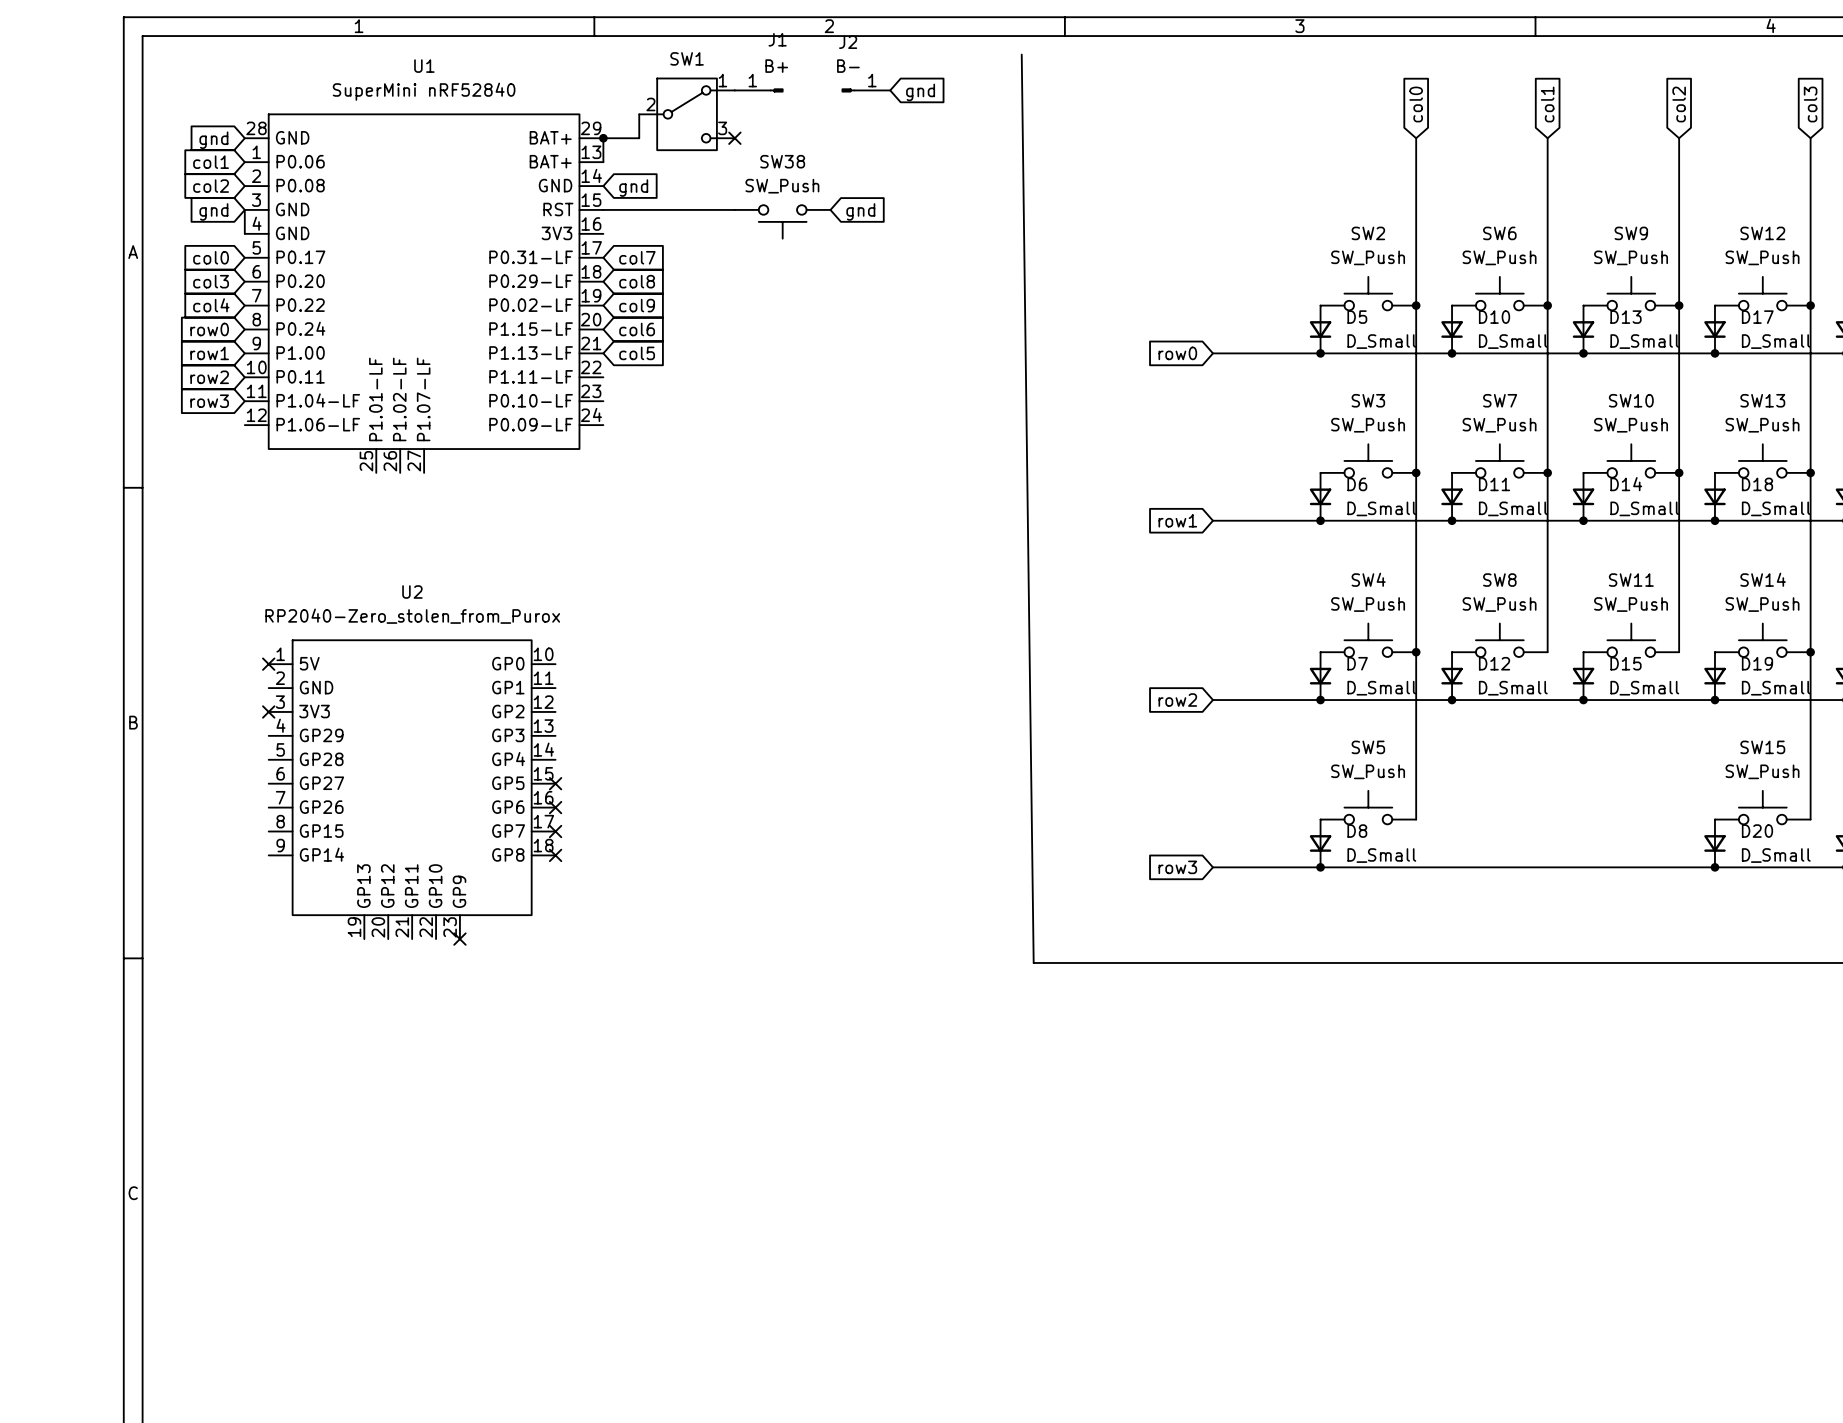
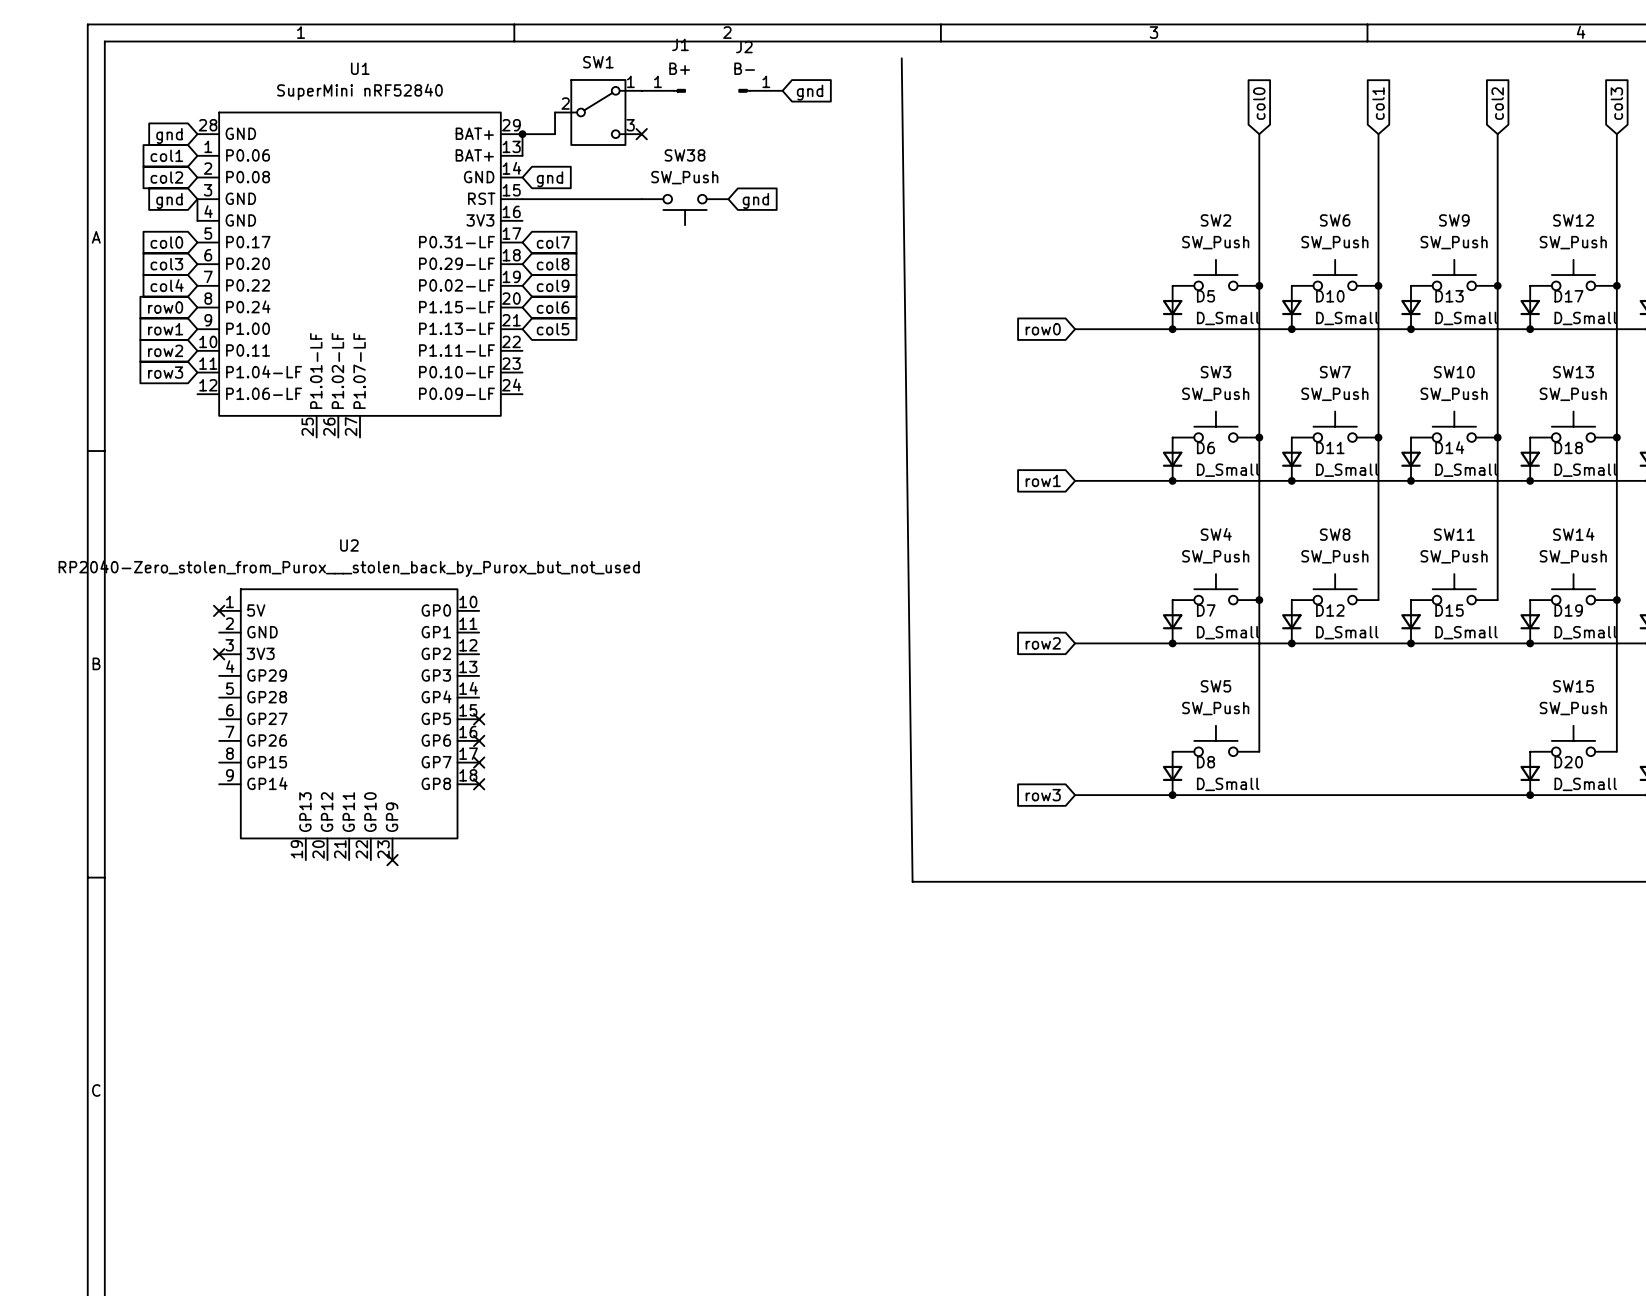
U2 value: RP2040-Zero_stolen_from_Purox (412, 616) -> RP2040-Zero_stolen_from_Purox___stolen_back_by_Purox_but_not_used (349, 568)

